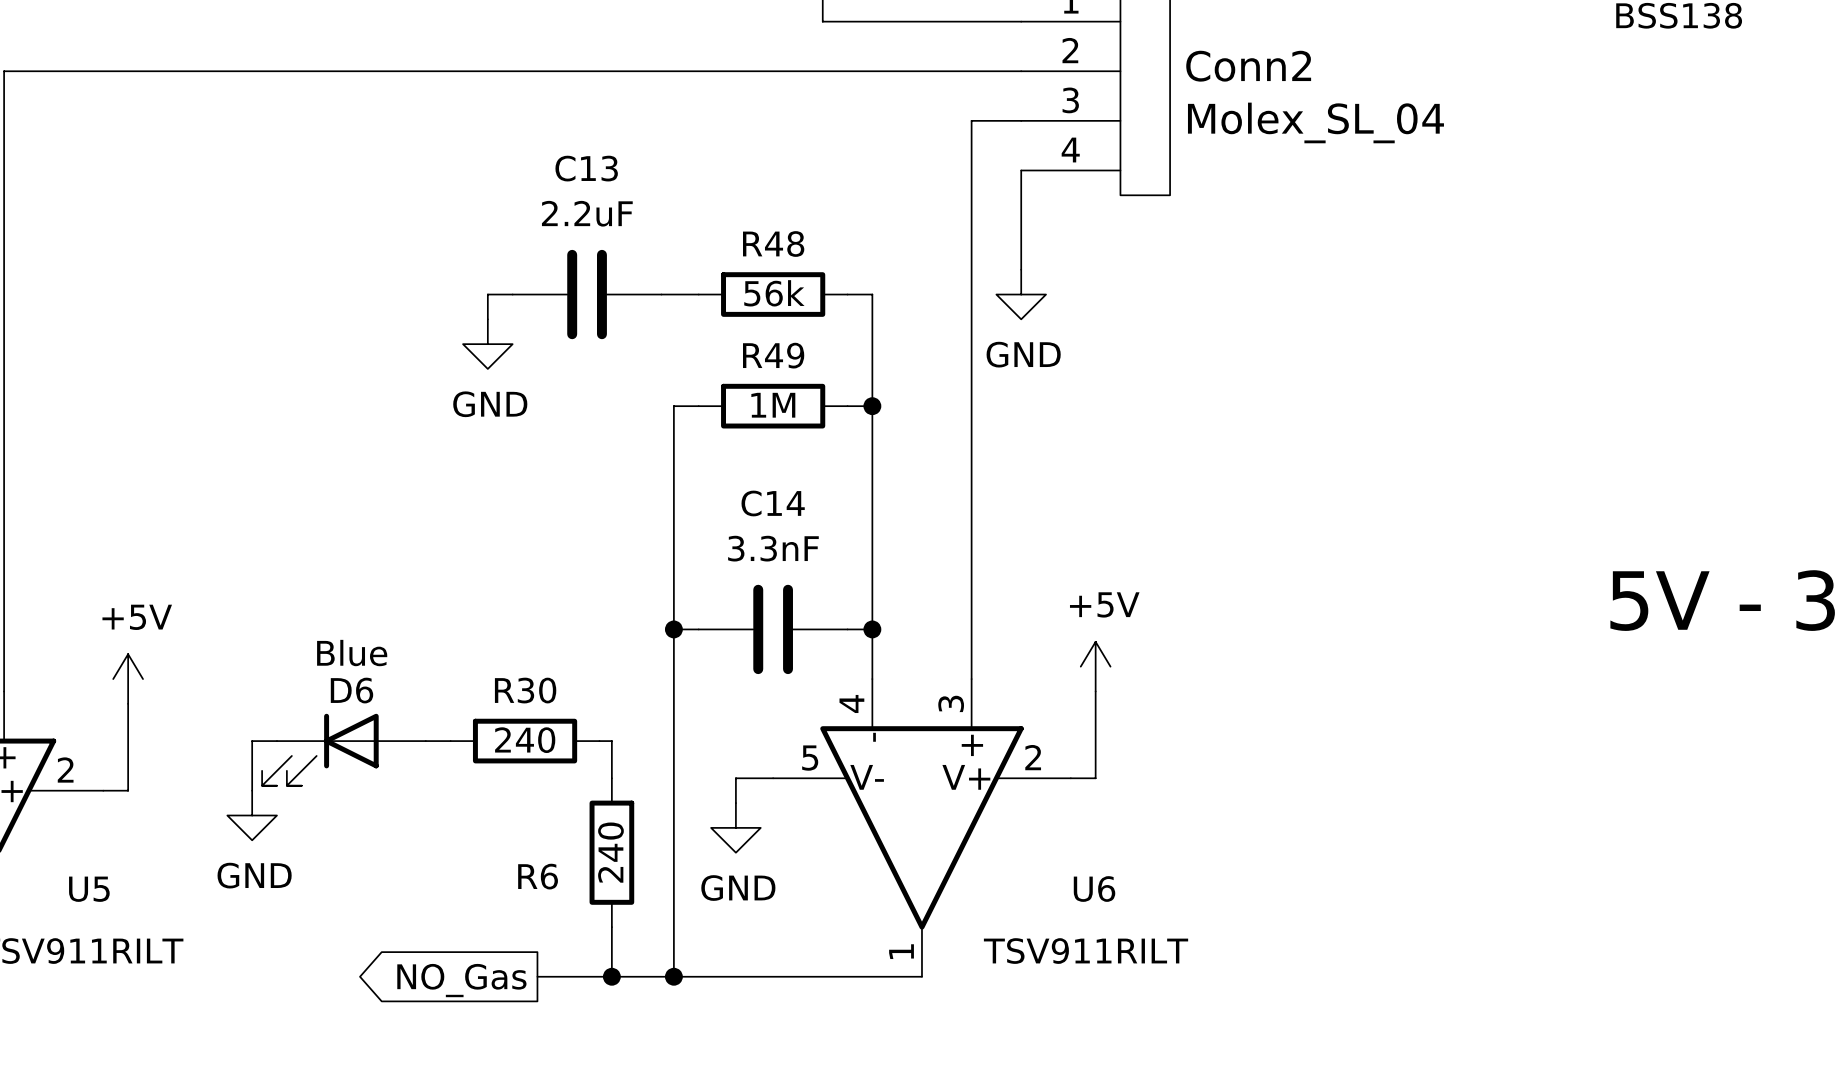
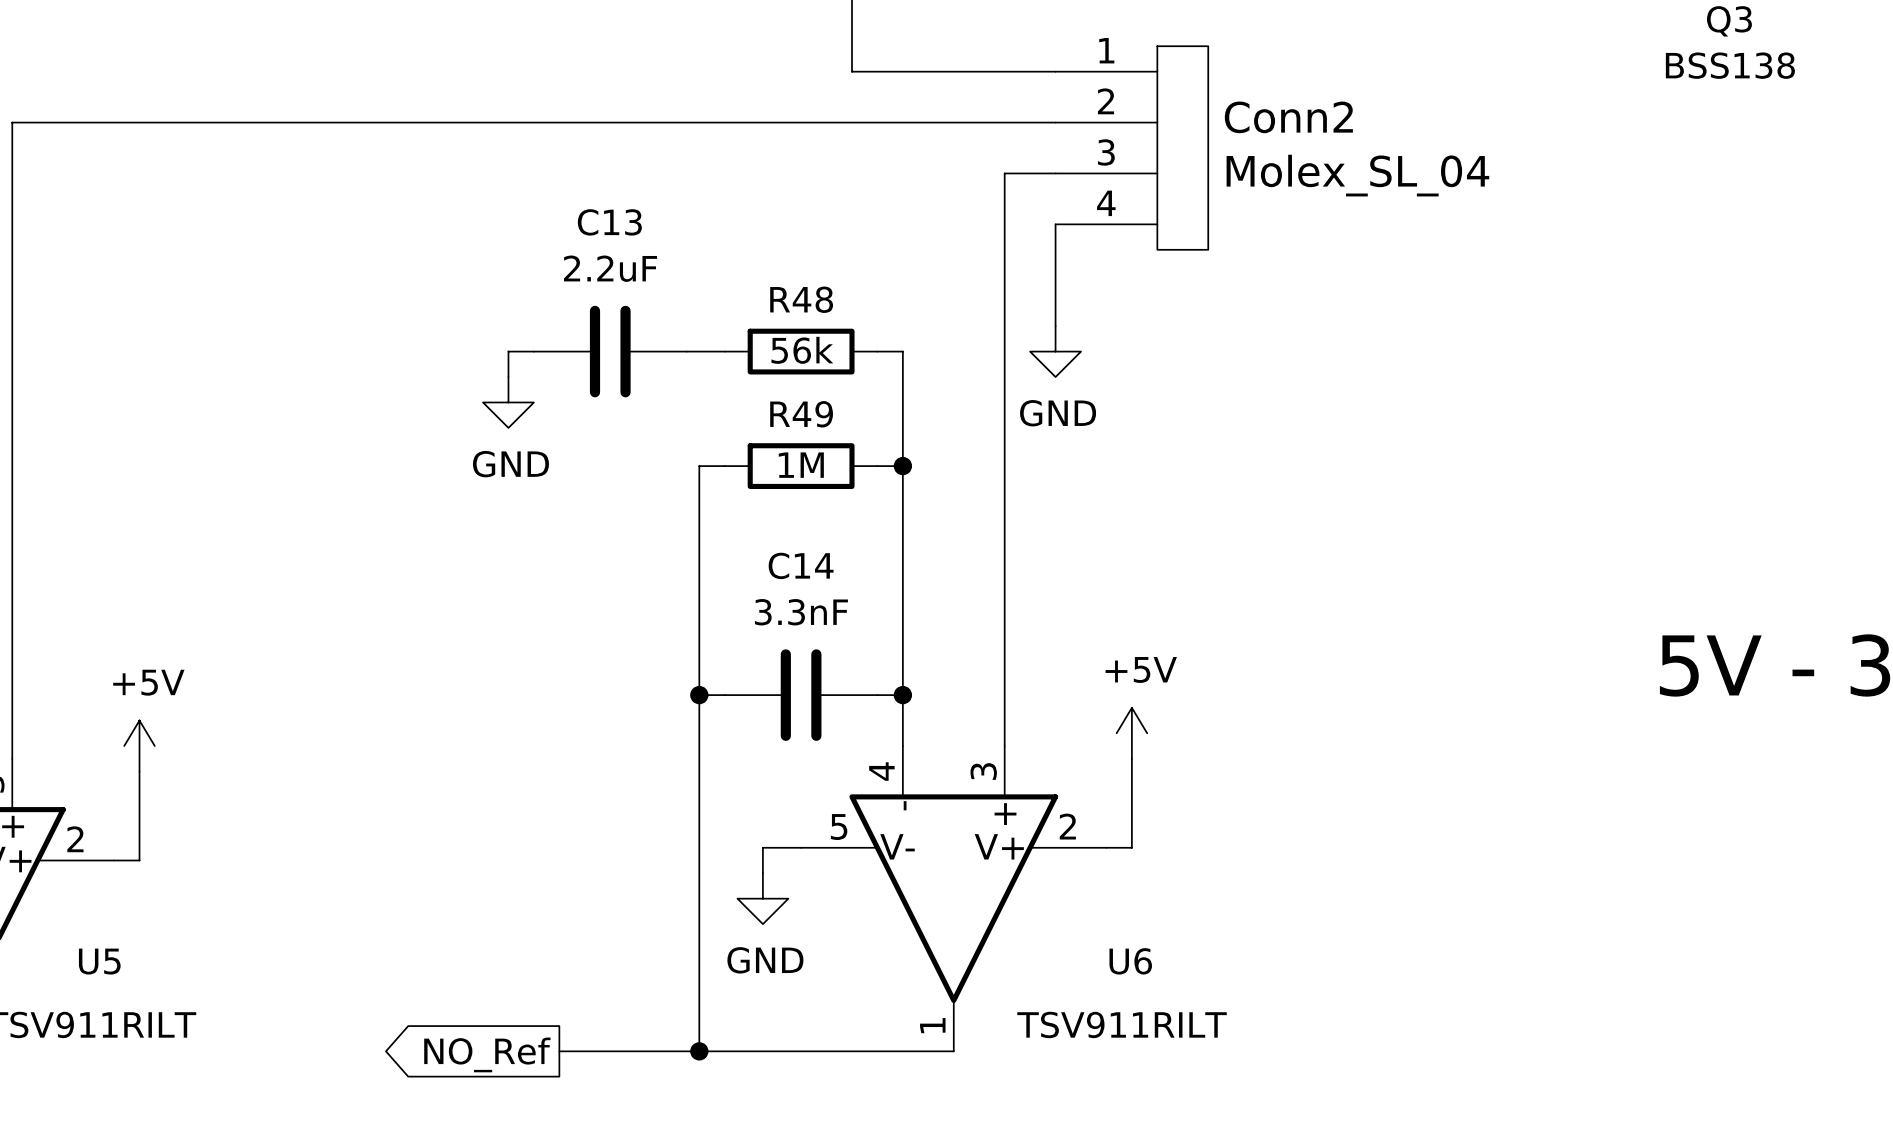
wire: (276, 741) (252, 741) (252, 790) -> none
wire: (425, 741) (450, 741) -> none
R30: 240 (525, 741) -> none
wire: (599, 741) (611, 741) (611, 778) -> none
D6: Blue (343, 749) -> none
power symbol: GND (252, 815) -> none
R6: 240 (611, 852) -> none
wire: (611, 927) (611, 976) -> none
junction: (611, 976) -> none
global label: NO_Gas (461, 980) -> NO_Ref (487, 1054)

